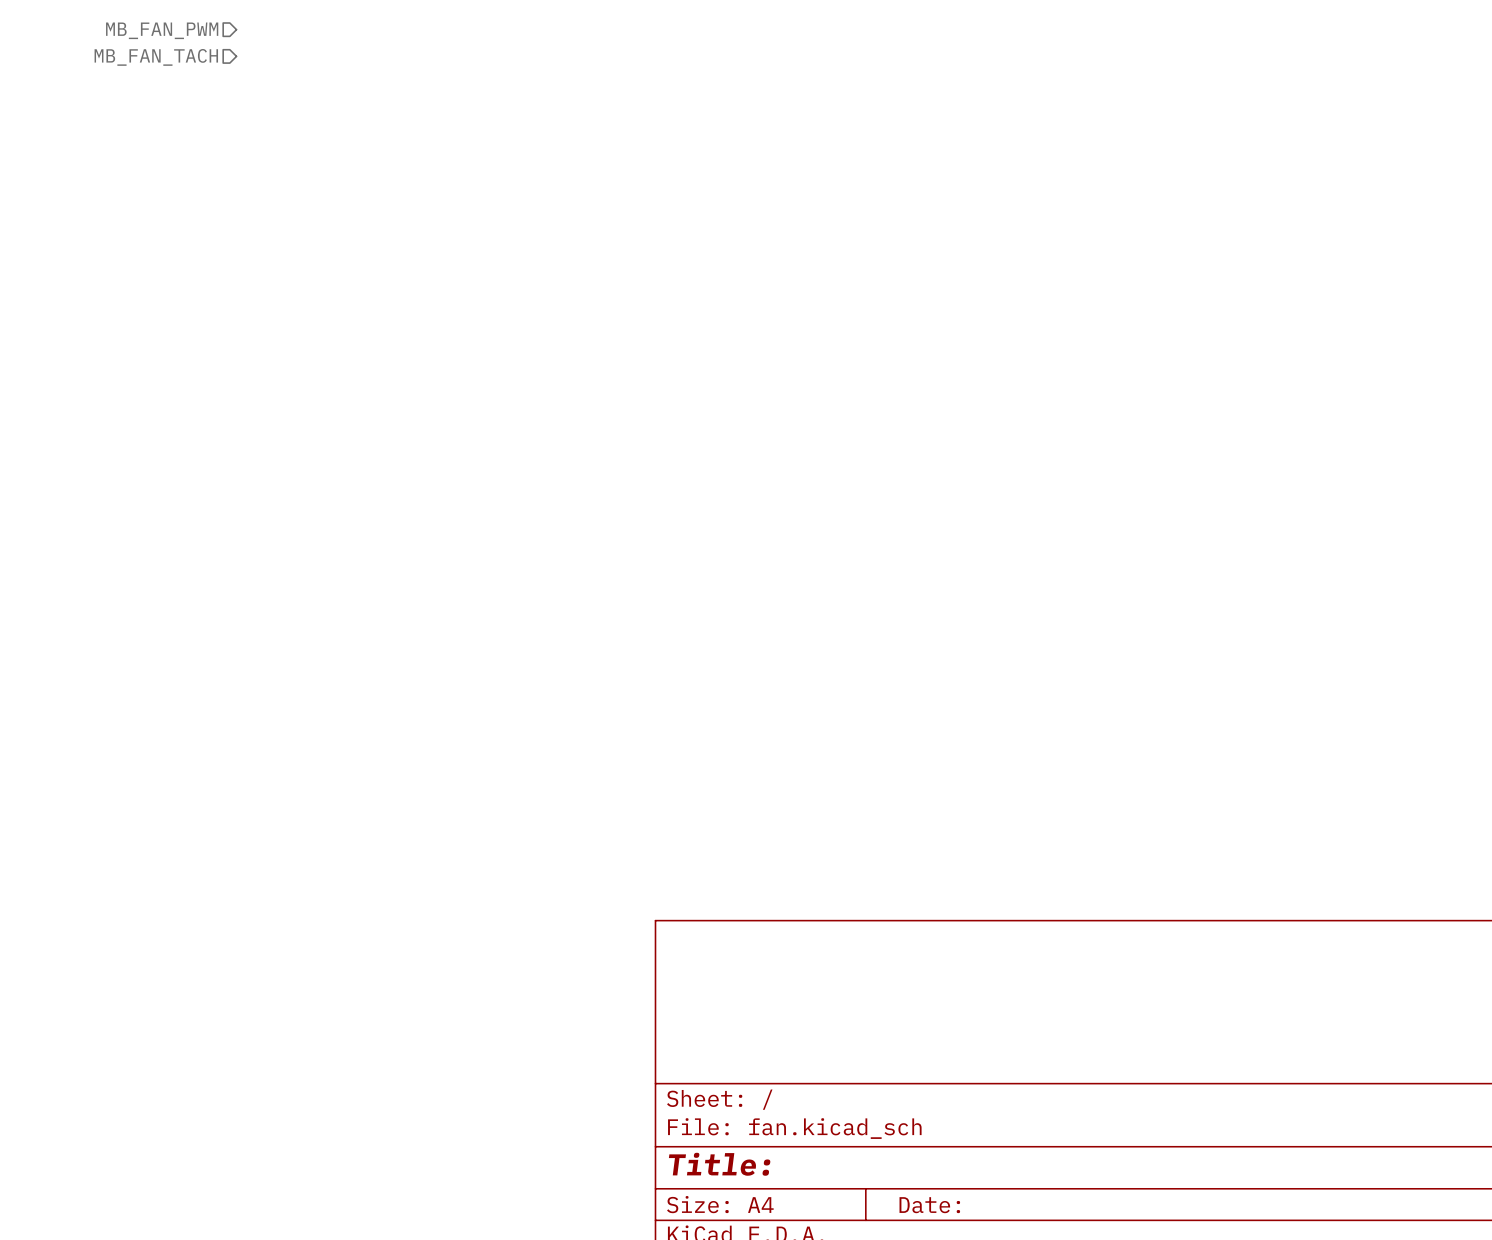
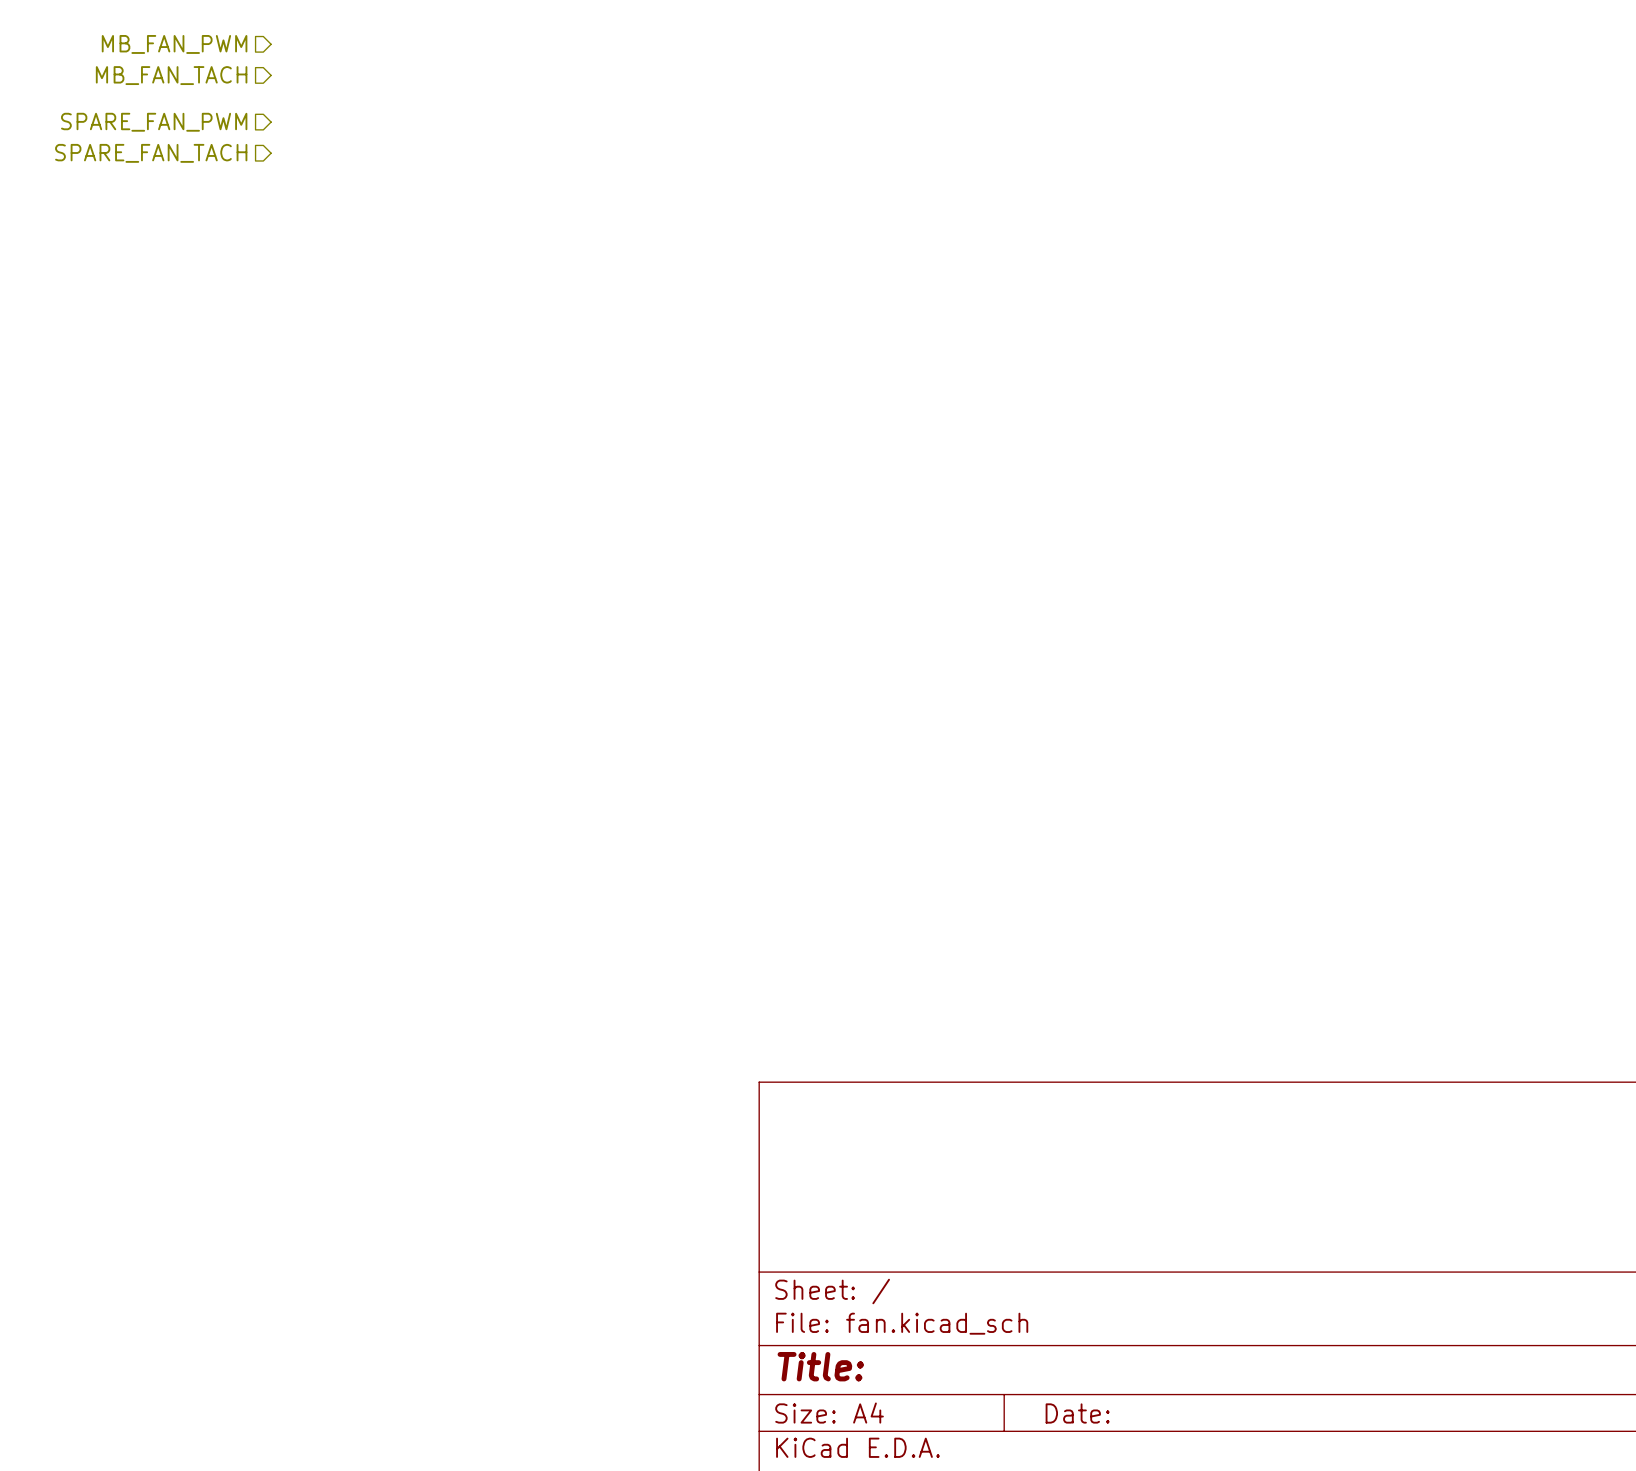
hierarchical label: none -> SPARE_FAN_PWM (154, 122)
hierarchical label: none -> SPARE_FAN_TACH (151, 153)

